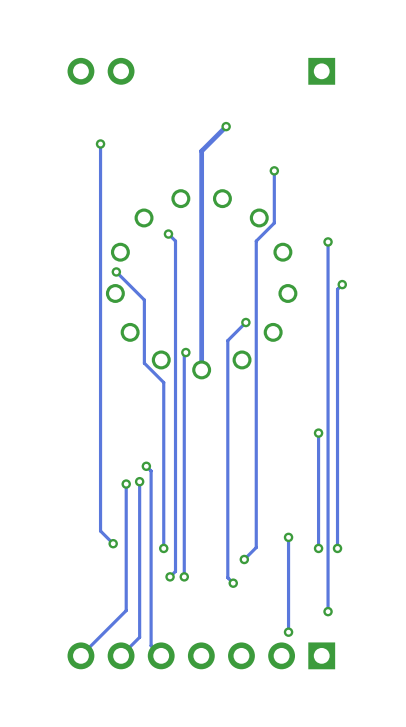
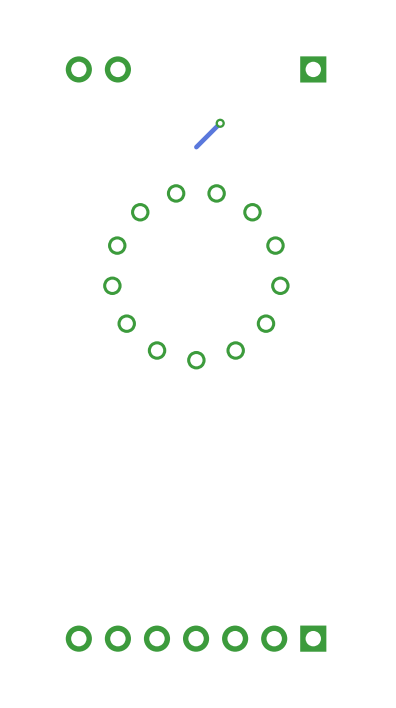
track: (100, 143) (100, 531) (113, 543) -> none
via: (100, 143) -> none
track: (201, 151) (201, 369) -> none
track: (274, 170) (274, 223) (256, 241) (256, 547) (244, 559) -> none
via: (274, 170) -> none
track: (168, 234) (175, 241) (175, 571) (170, 576) -> none
via: (168, 234) -> none
track: (328, 241) (328, 611) -> none
via: (328, 241) -> none
track: (116, 271) (144, 299) (144, 363) (163, 382) (163, 548) -> none
via: (116, 271) -> none
track: (342, 284) (337, 289) (337, 548) -> none
via: (342, 284) -> none
track: (245, 322) (227, 340) (227, 577) (233, 583) -> none
via: (245, 322) -> none
track: (185, 352) (184, 354) (184, 576) -> none
via: (185, 352) -> none
track: (318, 433) (318, 548) -> none
via: (318, 433) -> none
track: (146, 466) (151, 471) (151, 645) (161, 655) -> none
via: (146, 466) -> none
track: (139, 481) (139, 637) (121, 655) -> none
via: (139, 481) -> none
track: (126, 484) (126, 610) (80, 655) -> none
via: (126, 484) -> none
track: (288, 537) (288, 632) -> none
via: (288, 537) -> none
via: (113, 543) -> none
via: (163, 548) -> none
via: (318, 548) -> none
via: (337, 548) -> none
via: (244, 559) -> none
via: (170, 576) -> none
via: (184, 576) -> none
via: (233, 583) -> none
via: (328, 611) -> none
via: (288, 632) -> none

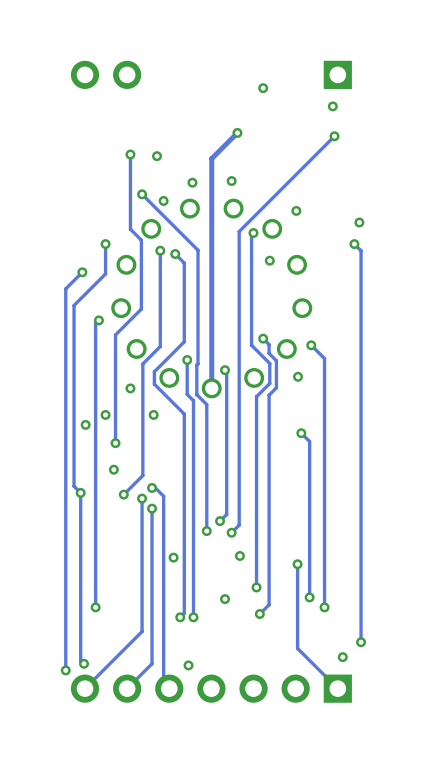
via: none -> (263, 88)
via: none -> (332, 106)
track: none -> (334, 136) (239, 231) (239, 525) (231, 532)
via: none -> (334, 136)
track: none -> (130, 154) (130, 229) (141, 240) (141, 309) (115, 334) (115, 443)
via: none -> (130, 154)
via: none -> (156, 156)
track: none -> (211, 158) (211, 388)
via: none -> (231, 181)
via: none -> (192, 182)
track: none -> (142, 194) (198, 250) (196, 394) (206, 404) (206, 531)
via: none -> (142, 194)
via: none -> (163, 200)
via: none -> (296, 210)
via: none -> (359, 222)
track: none -> (253, 233) (251, 234) (251, 345) (269, 363) (269, 383) (256, 396) (256, 587)
via: none -> (253, 233)
track: none -> (105, 244) (105, 273) (74, 305) (74, 486) (80, 492) (80, 660) (84, 663)
via: none -> (105, 244)
track: none -> (354, 244) (361, 250) (361, 642)
via: none -> (354, 244)
track: none -> (160, 250) (160, 346) (142, 363) (142, 475) (123, 494)
via: none -> (160, 250)
track: none -> (175, 254) (184, 263) (184, 341) (154, 371) (154, 384) (184, 414) (184, 613) (180, 617)
via: none -> (175, 254)
via: none -> (269, 260)
track: none -> (82, 272) (65, 288) (65, 670)
via: none -> (82, 272)
track: none -> (98, 320) (95, 323) (95, 607)
via: none -> (98, 320)
track: none -> (263, 338) (269, 344) (269, 353) (276, 360) (276, 387) (269, 395) (269, 604) (259, 614)
via: none -> (263, 338)
track: none -> (311, 345) (324, 358) (324, 607)
via: none -> (311, 345)
track: none -> (187, 360) (187, 394) (193, 400) (193, 617)
via: none -> (187, 360)
track: none -> (225, 370) (226, 371) (226, 514) (220, 521)
via: none -> (225, 370)
via: none -> (298, 376)
via: none -> (130, 388)
via: none -> (105, 414)
via: none -> (153, 414)
via: none -> (85, 424)
track: none -> (301, 433) (309, 441) (309, 597)
via: none -> (301, 433)
via: none -> (115, 443)
via: none -> (113, 469)
via: none -> (152, 487)
track: none -> (154, 490) (152, 487) (155, 487) (163, 496) (163, 683) (169, 688)
via: none -> (80, 492)
via: none -> (123, 494)
track: none -> (142, 498) (142, 631) (85, 688)
via: none -> (142, 498)
track: none -> (152, 508) (152, 663) (127, 688)
via: none -> (152, 508)
via: none -> (220, 521)
via: none -> (206, 531)
via: none -> (231, 532)
via: none -> (239, 555)
via: none -> (173, 557)
track: none -> (297, 564) (297, 648) (337, 688)
via: none -> (297, 564)
via: none -> (256, 587)
via: none -> (309, 597)
via: none -> (225, 599)
via: none -> (95, 607)
via: none -> (324, 607)
via: none -> (259, 614)
via: none -> (180, 617)
via: none -> (193, 617)
via: none -> (361, 642)
via: none -> (342, 657)
via: none -> (84, 663)
via: none -> (188, 665)
via: none -> (65, 670)

